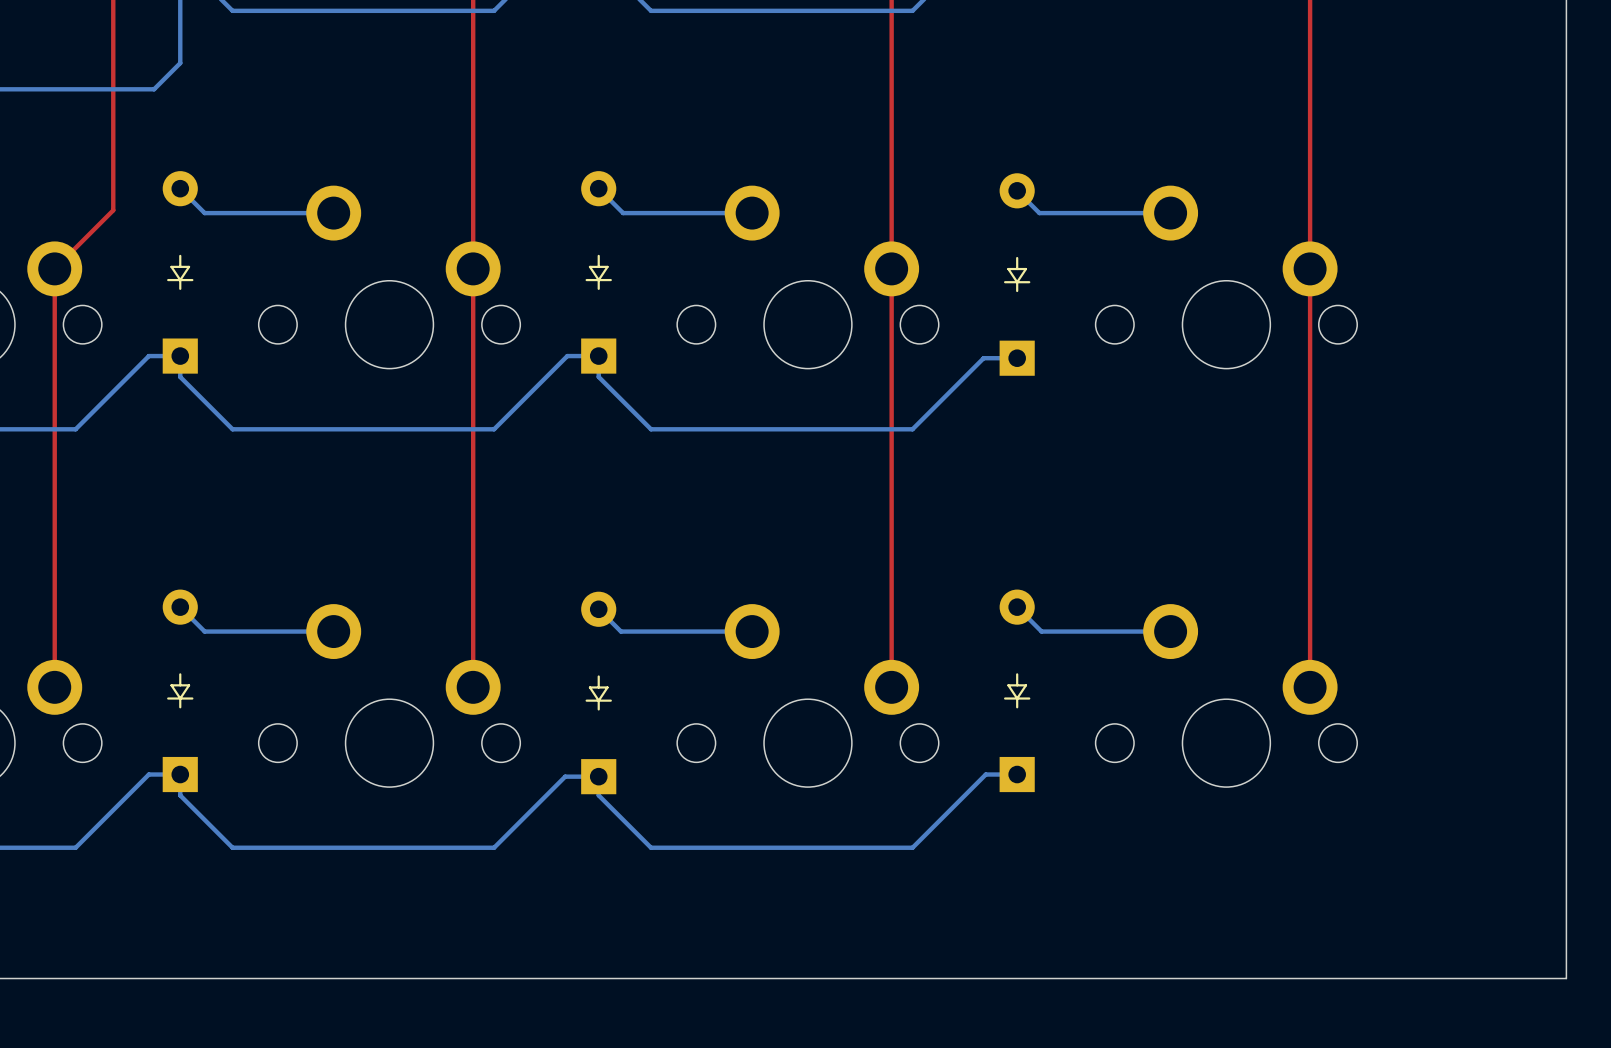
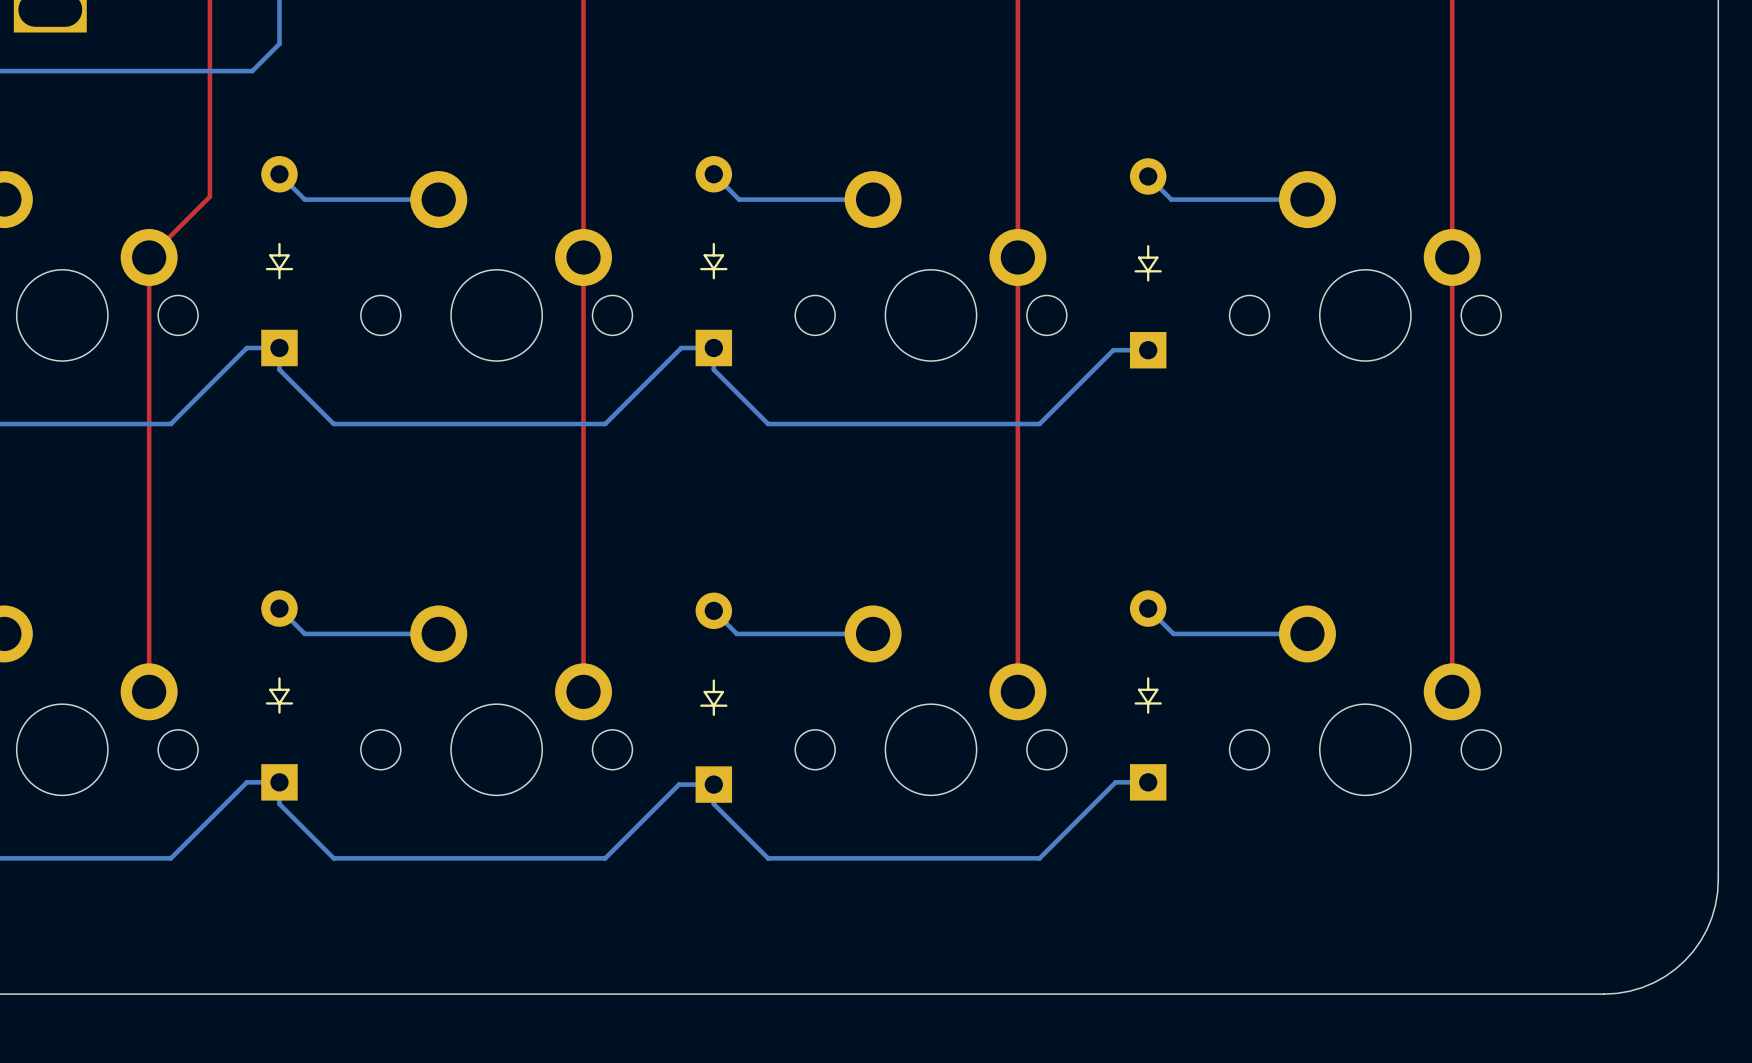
board edge: (1566, 868) (1566, 978) (1456, 978) -> (1718, 880) (1715, 905) (1707, 929) (1684, 960) (1653, 982) (1629, 991) (1604, 994)

